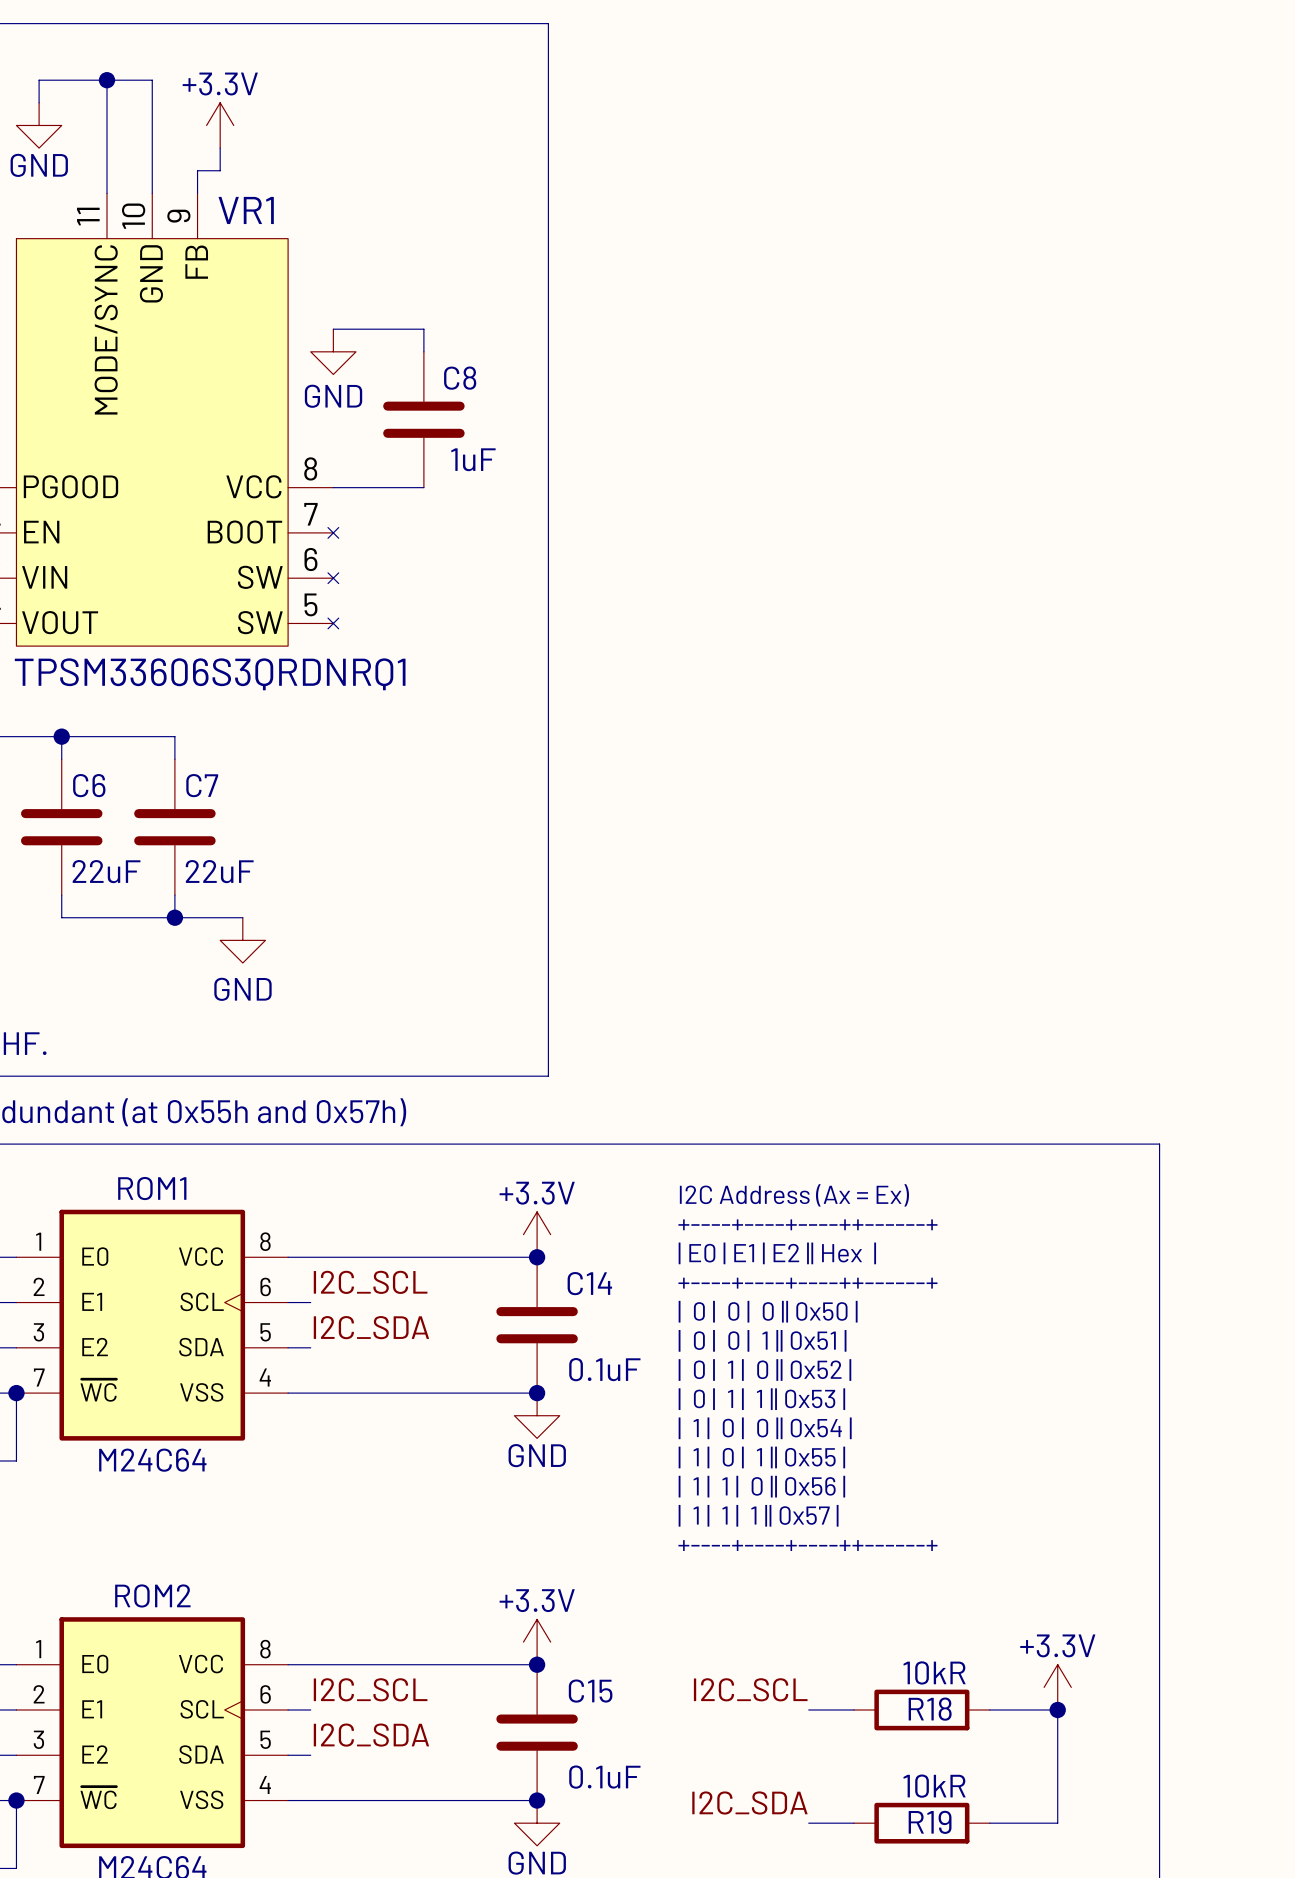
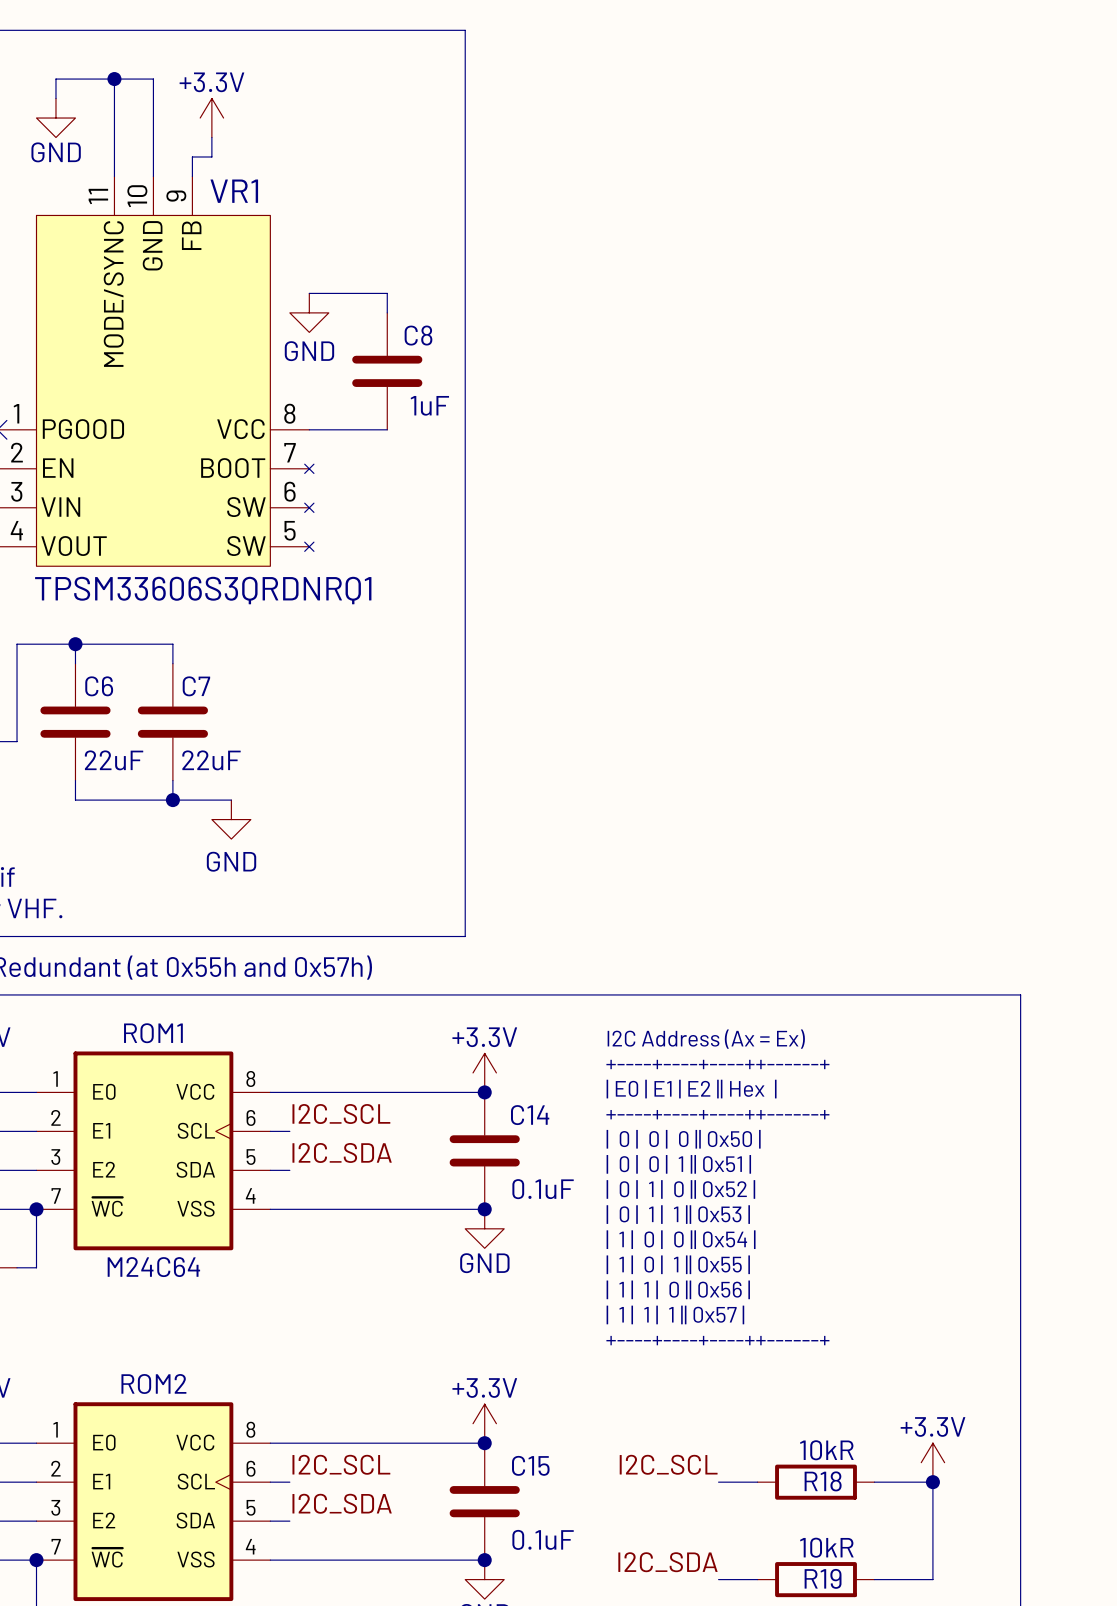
line: (514, 23) (548, 23) (548, 1076) (514, 1076) -> (465, 30) (465, 936)

